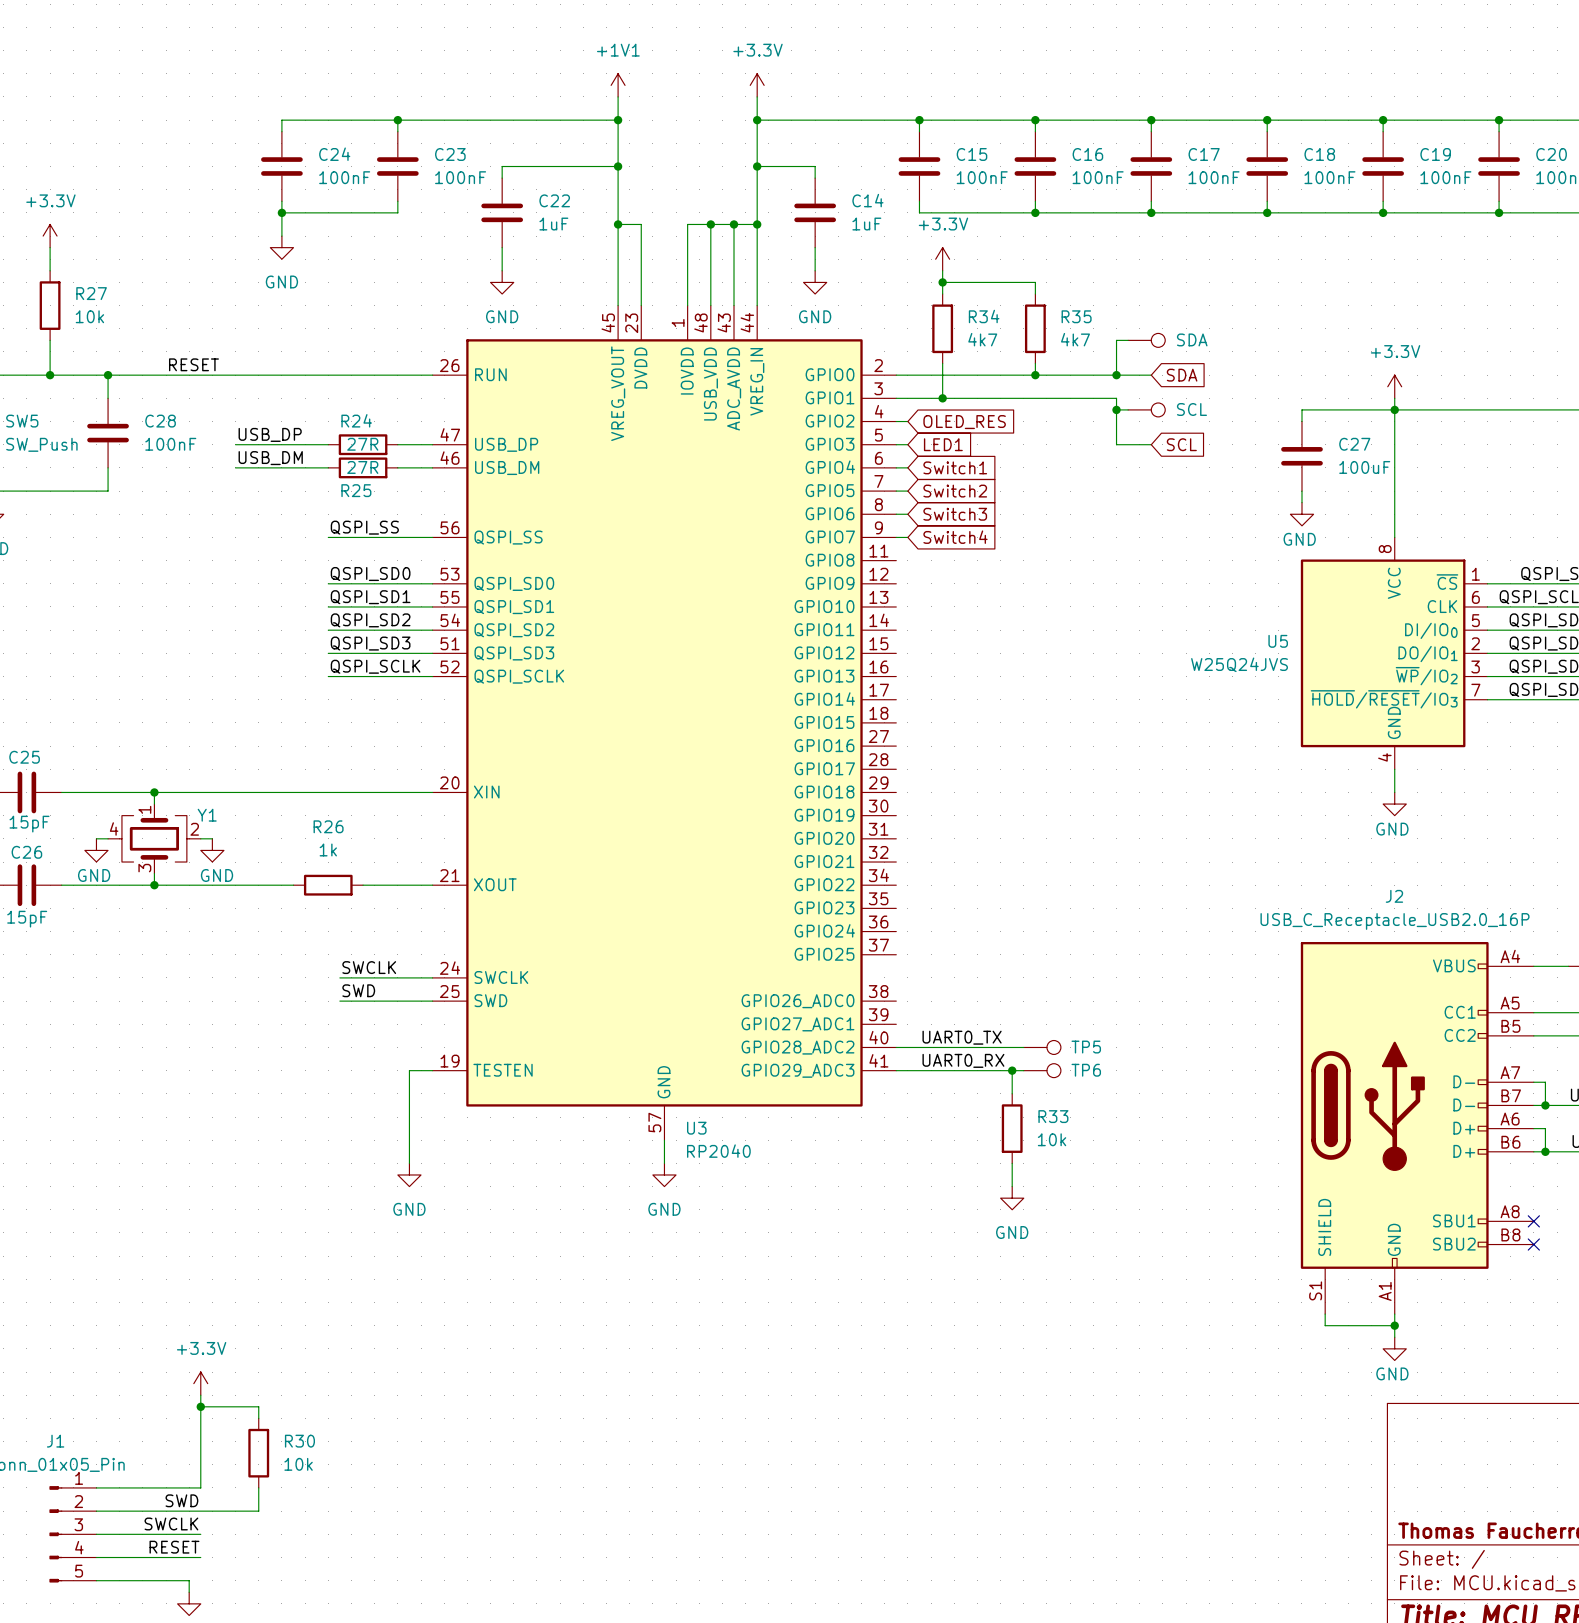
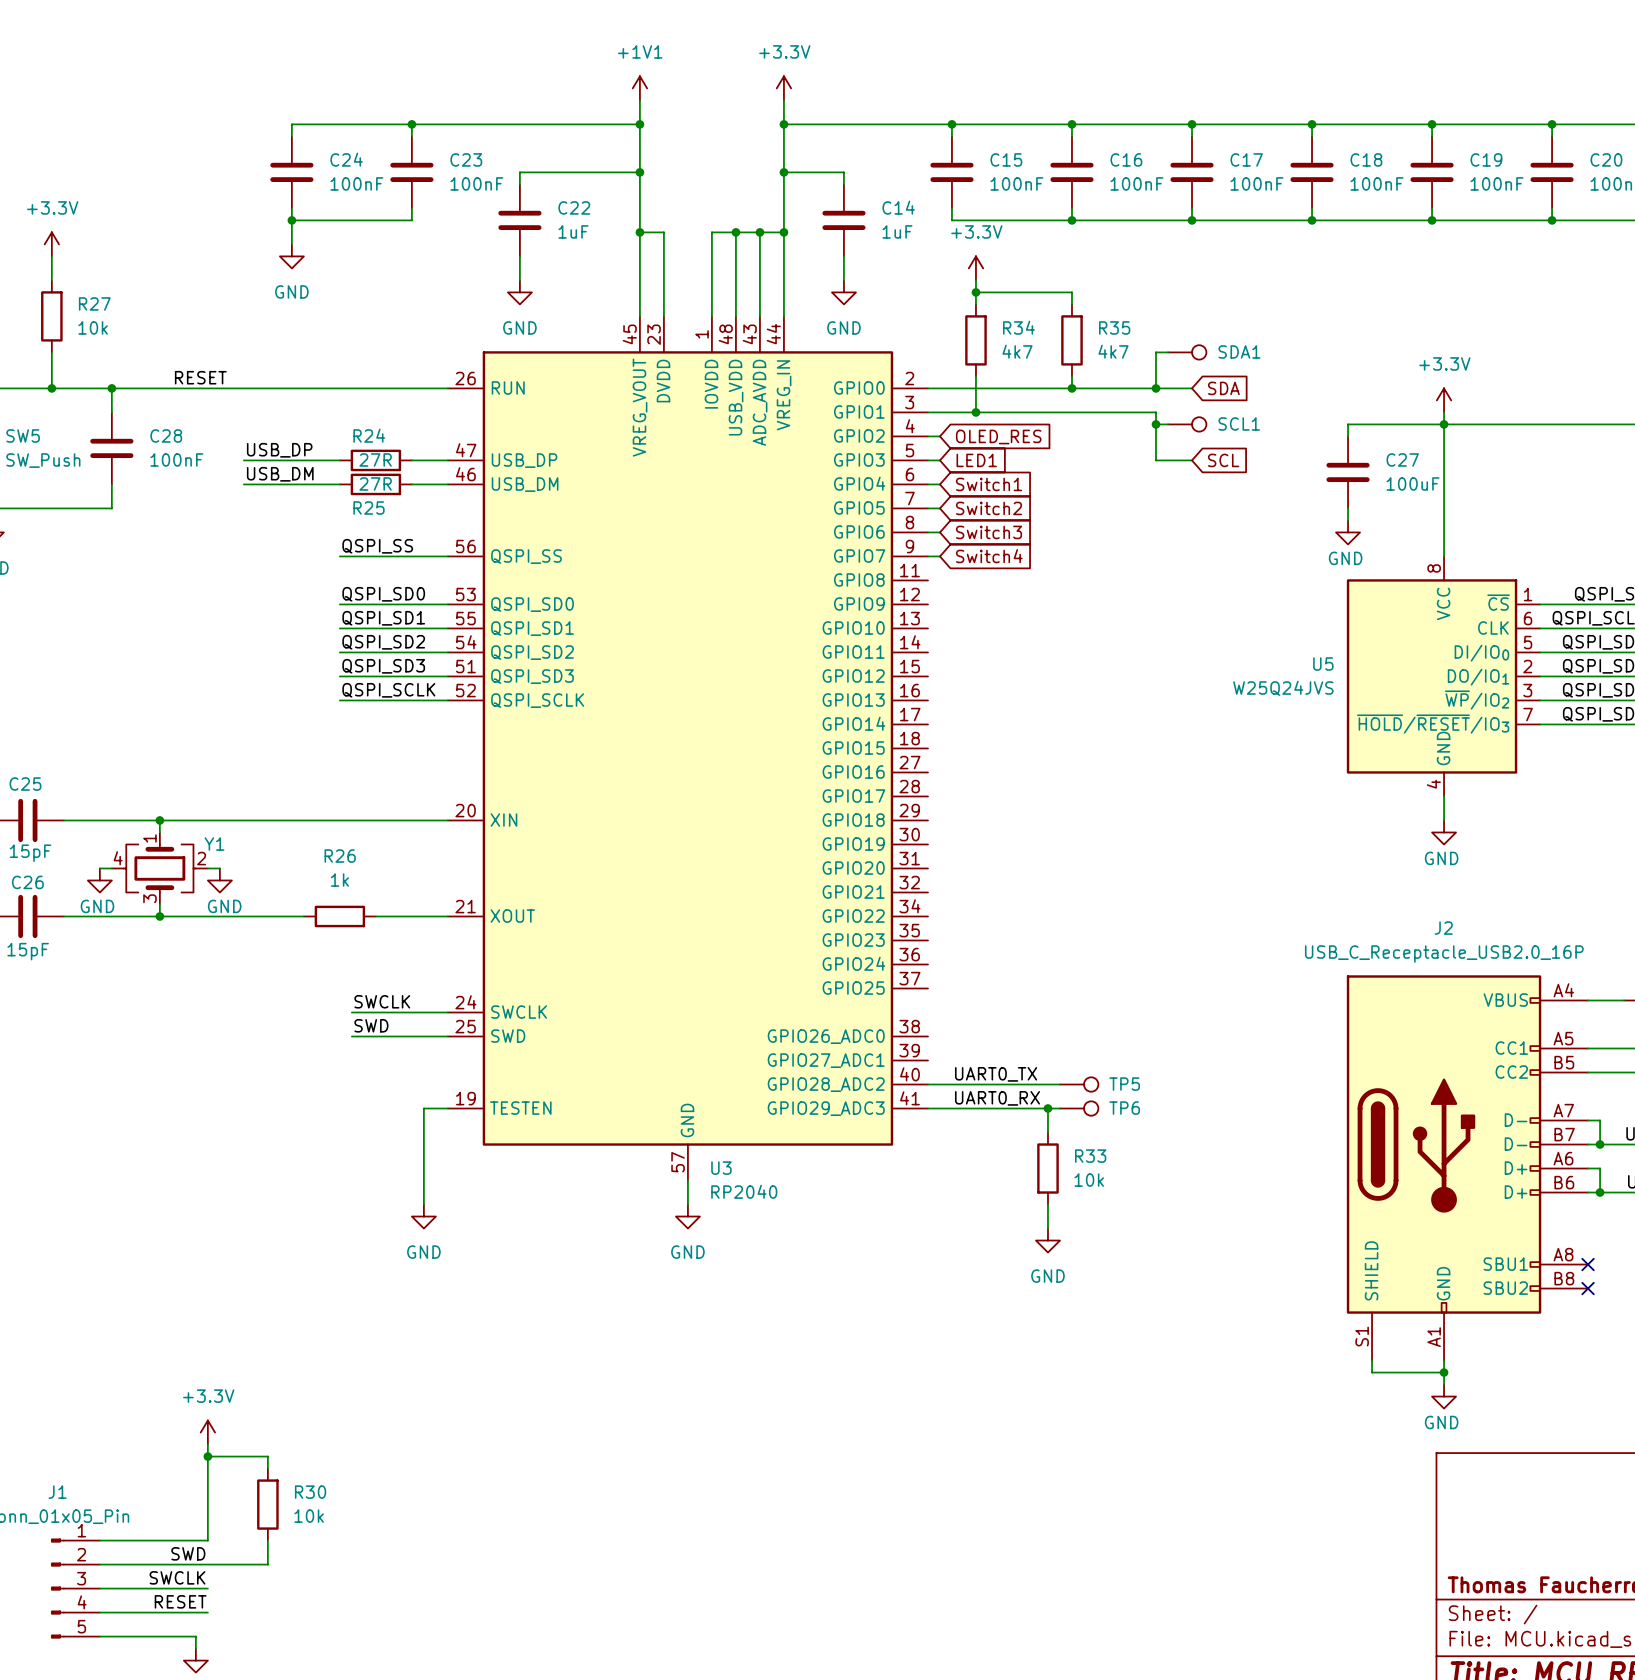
SDA name: SDA (1192, 339) -> SDA1 (1239, 351)
SCL name: SCL (1191, 409) -> SCL1 (1239, 423)

